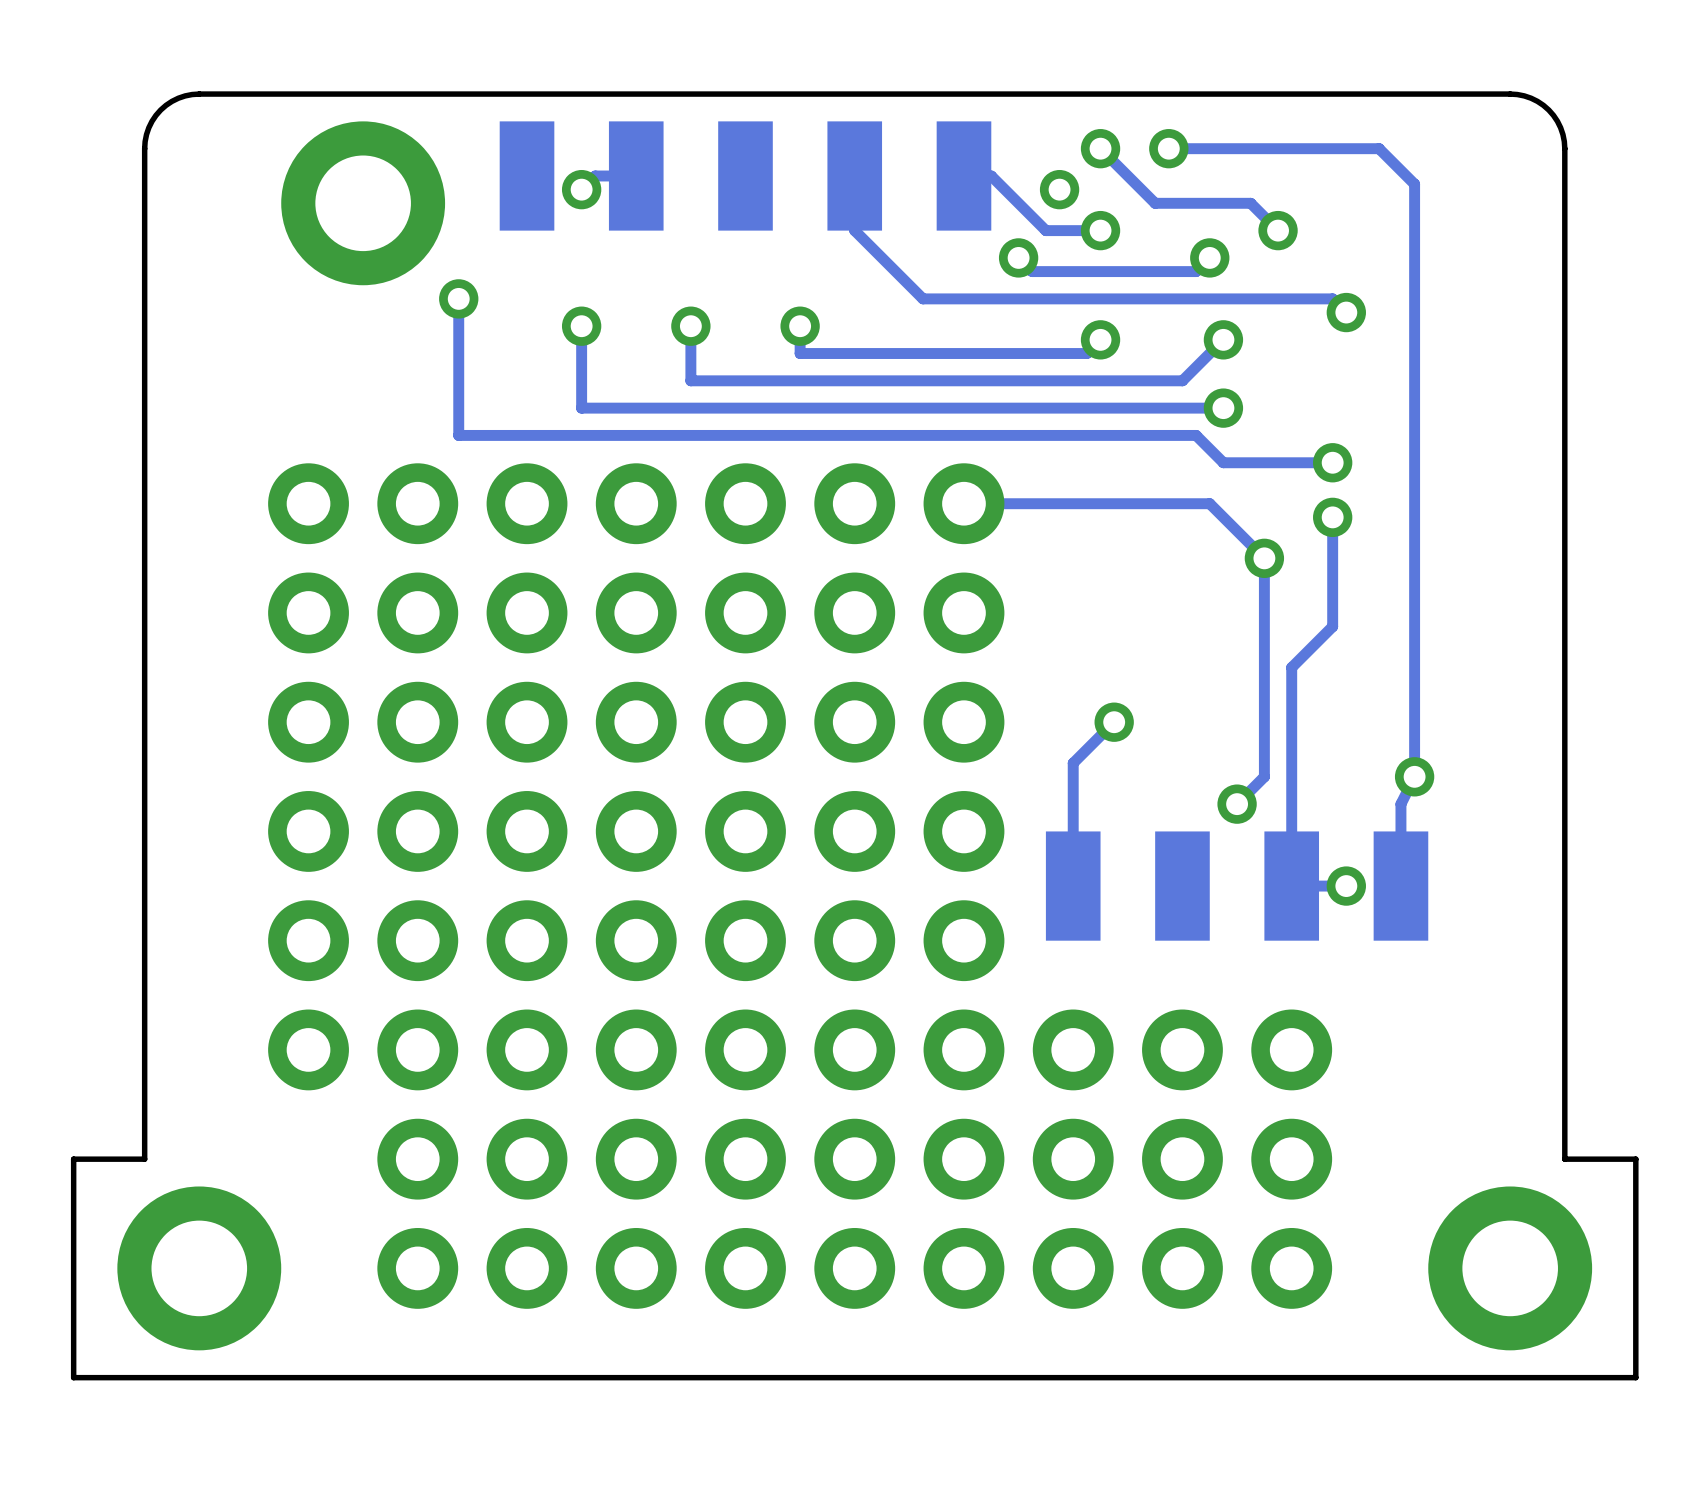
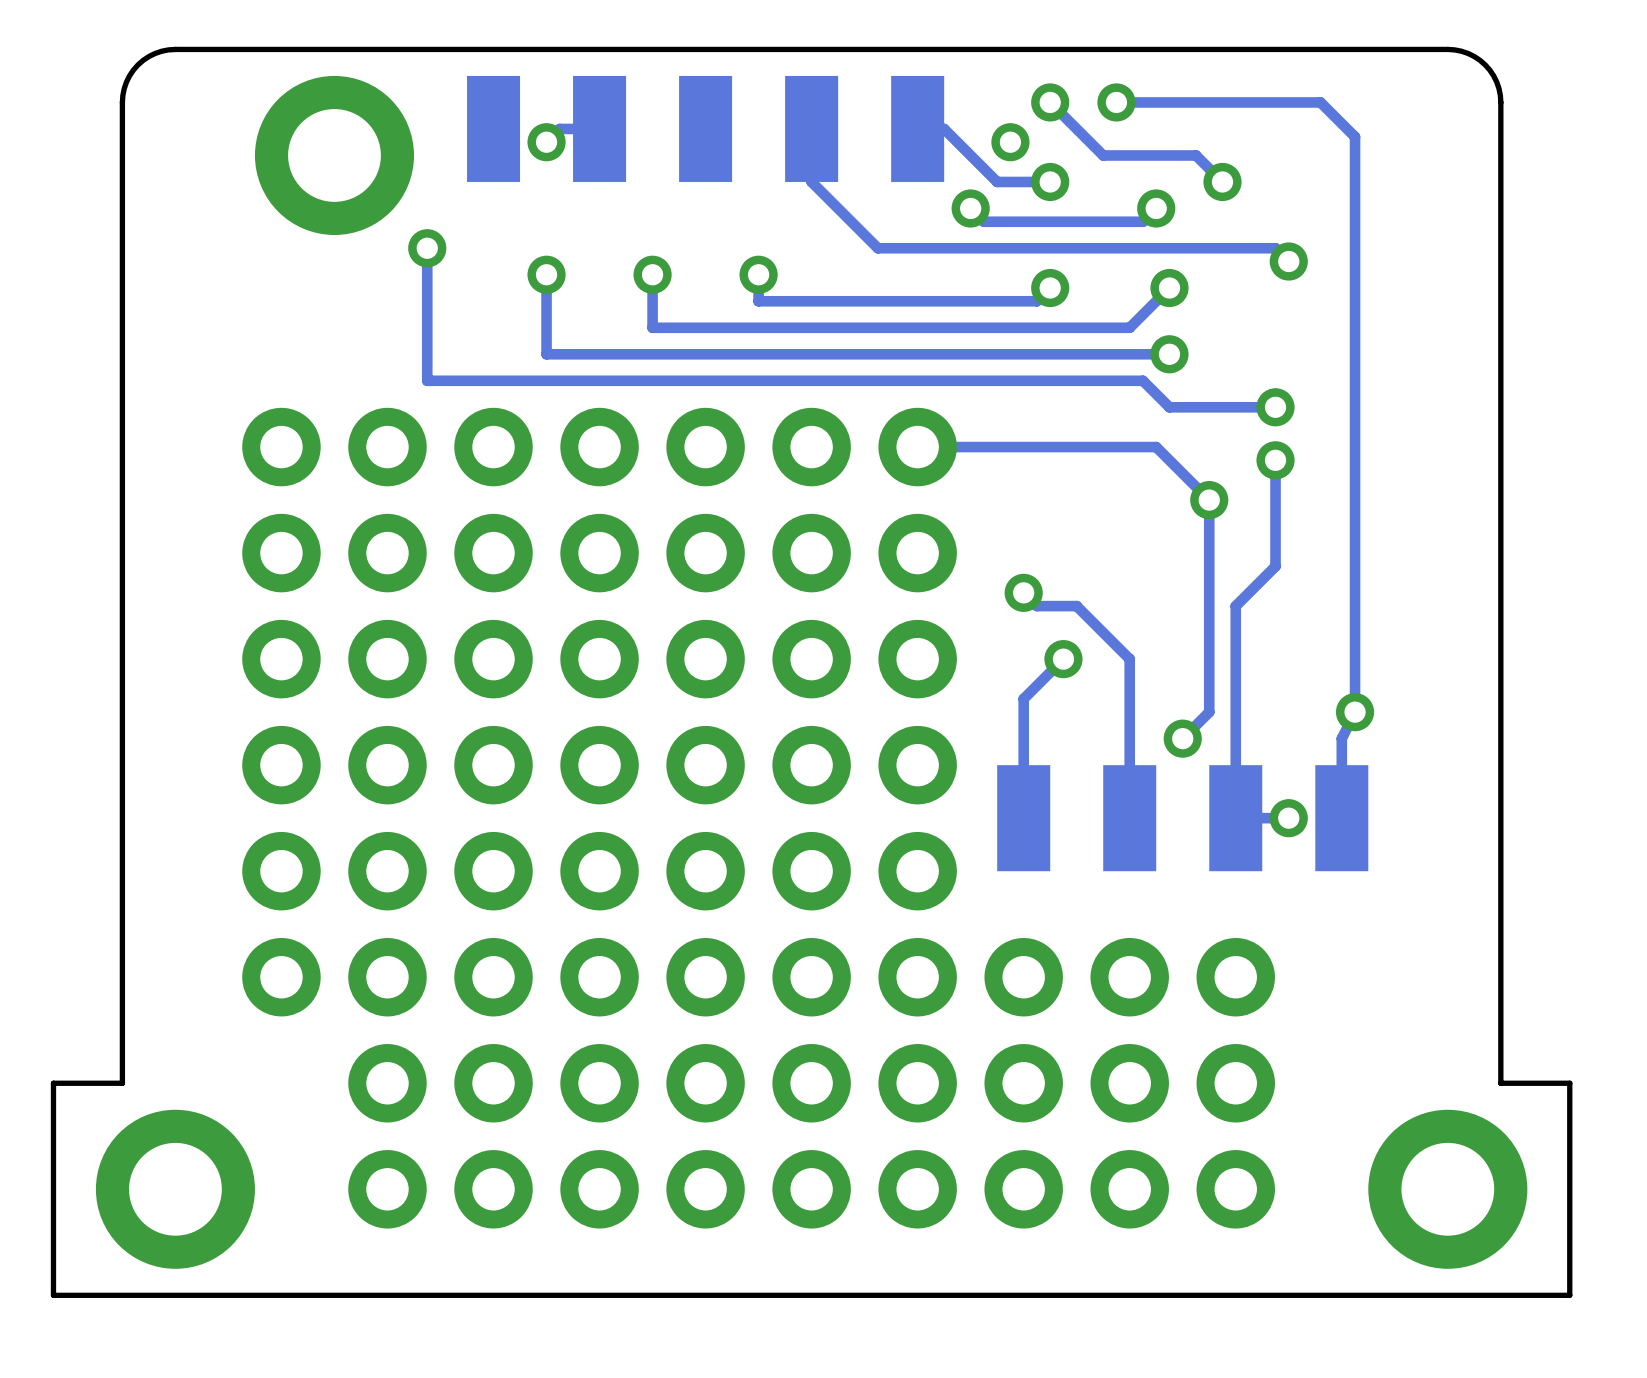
track: none -> (1023, 592) (1036, 606) (1076, 606) (1129, 659) (1129, 818)
via: none -> (1023, 592)

